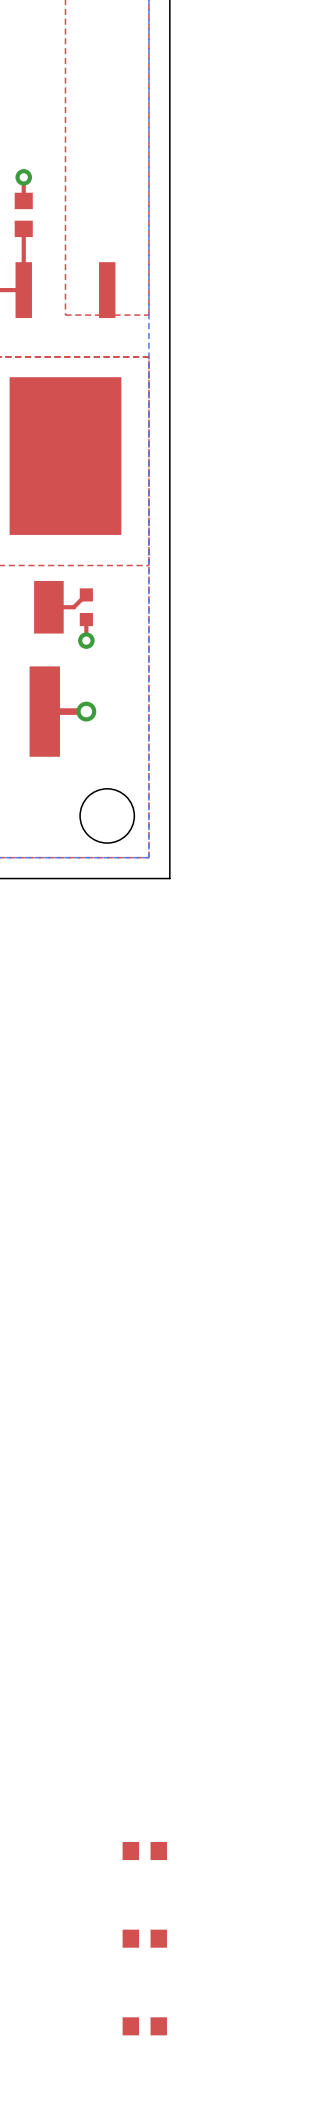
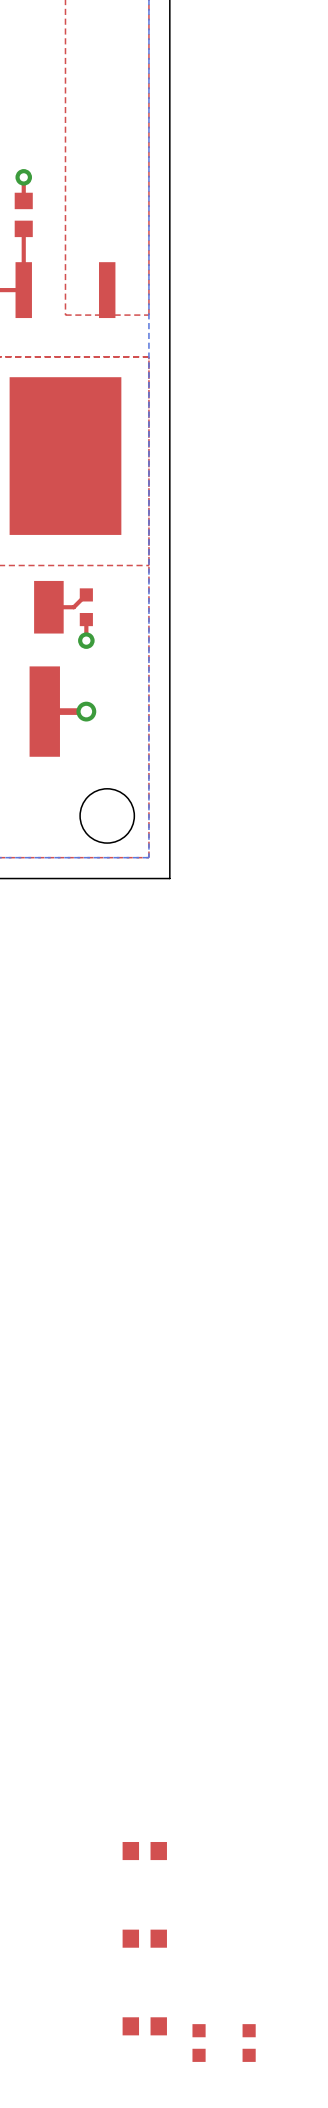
part: none -> (199, 2043)
part: none -> (249, 2043)

